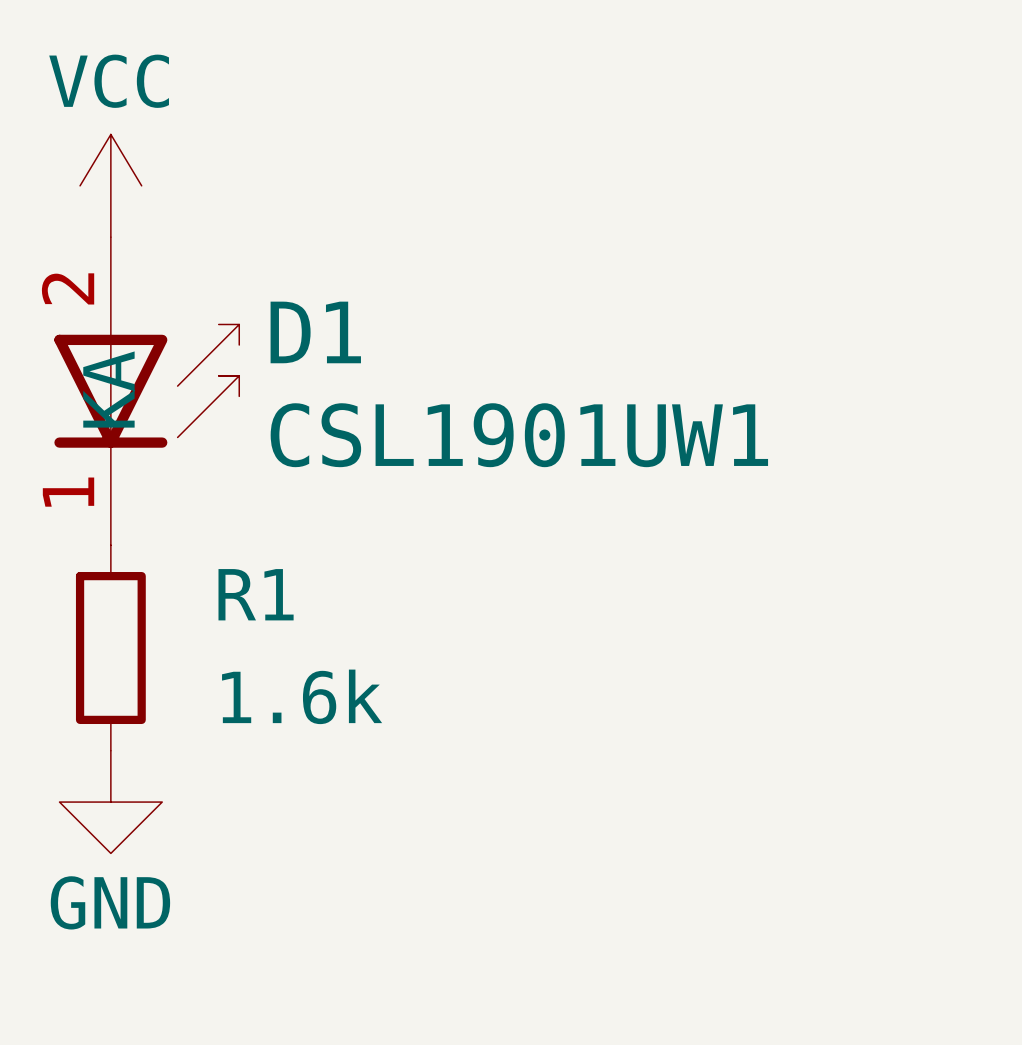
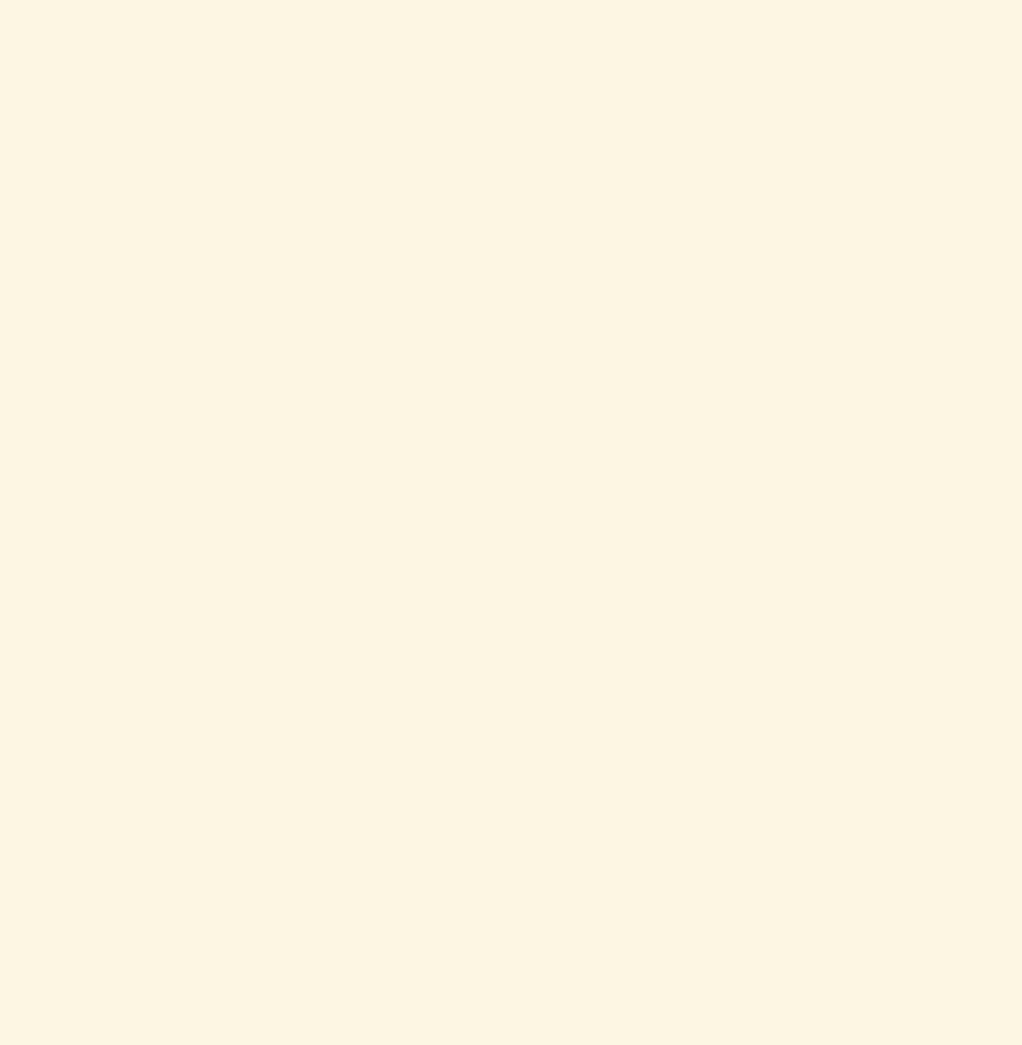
power symbol: VCC (110, 185) -> none
D1: CSL1901UW1 (146, 391) -> none
R1: 1.6k (110, 648) -> none
power symbol: GND (110, 802) -> none

